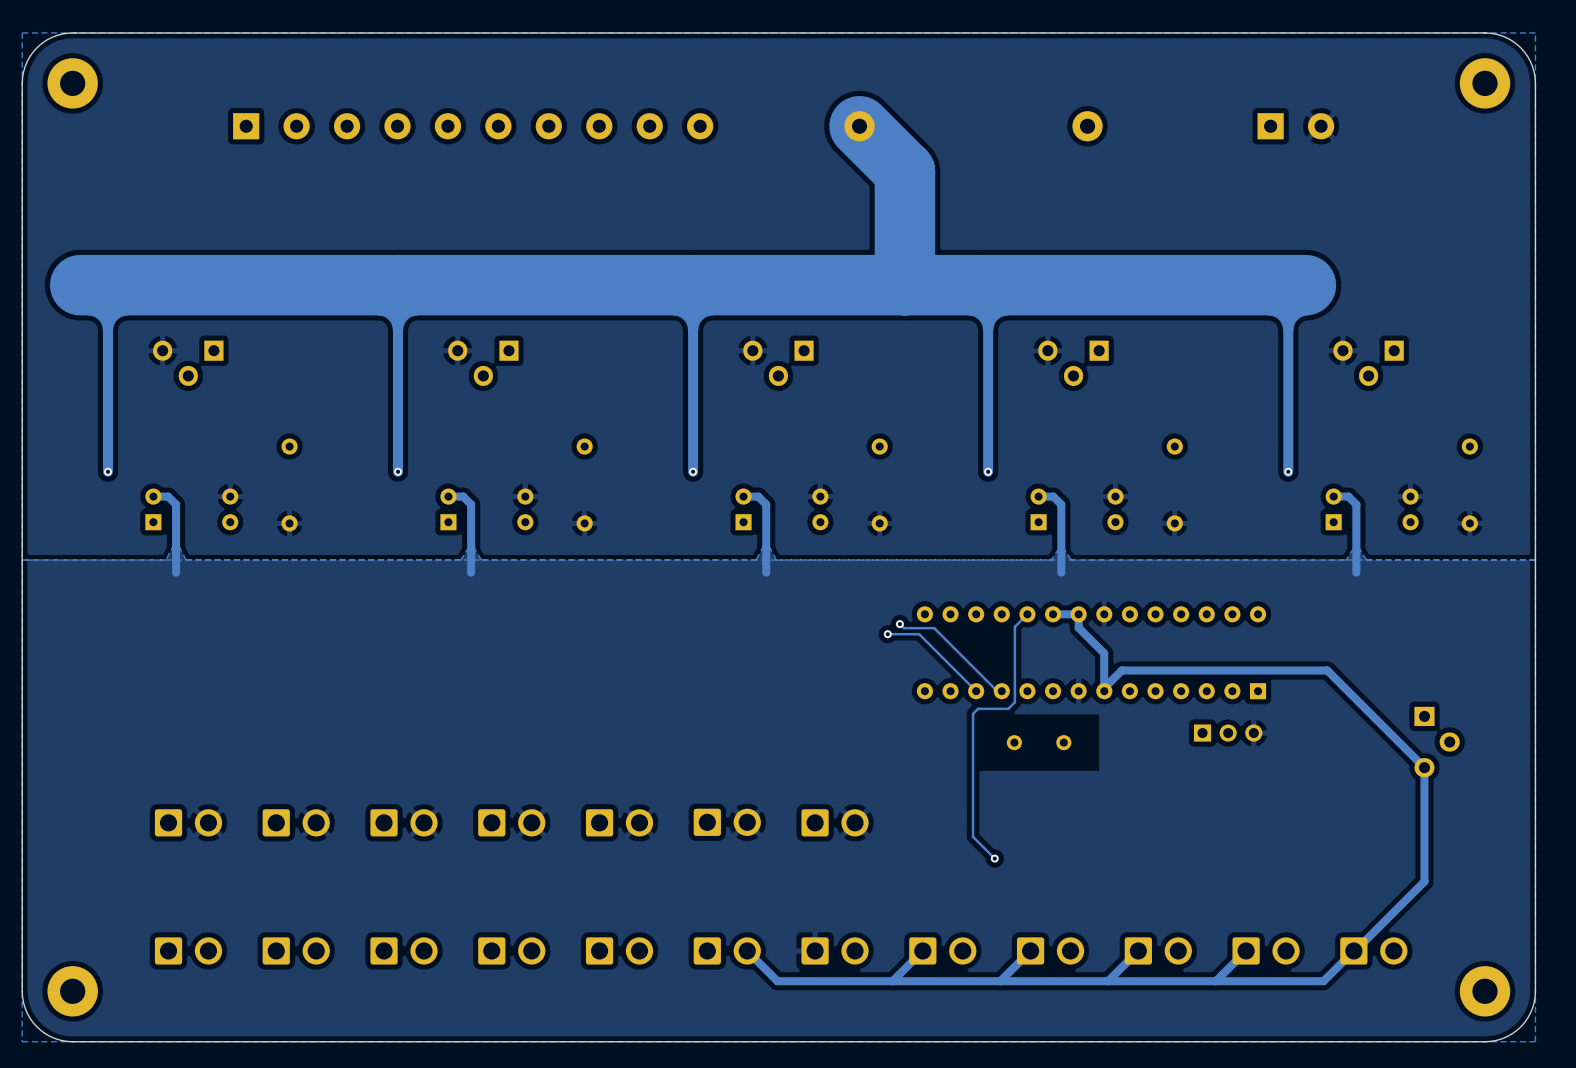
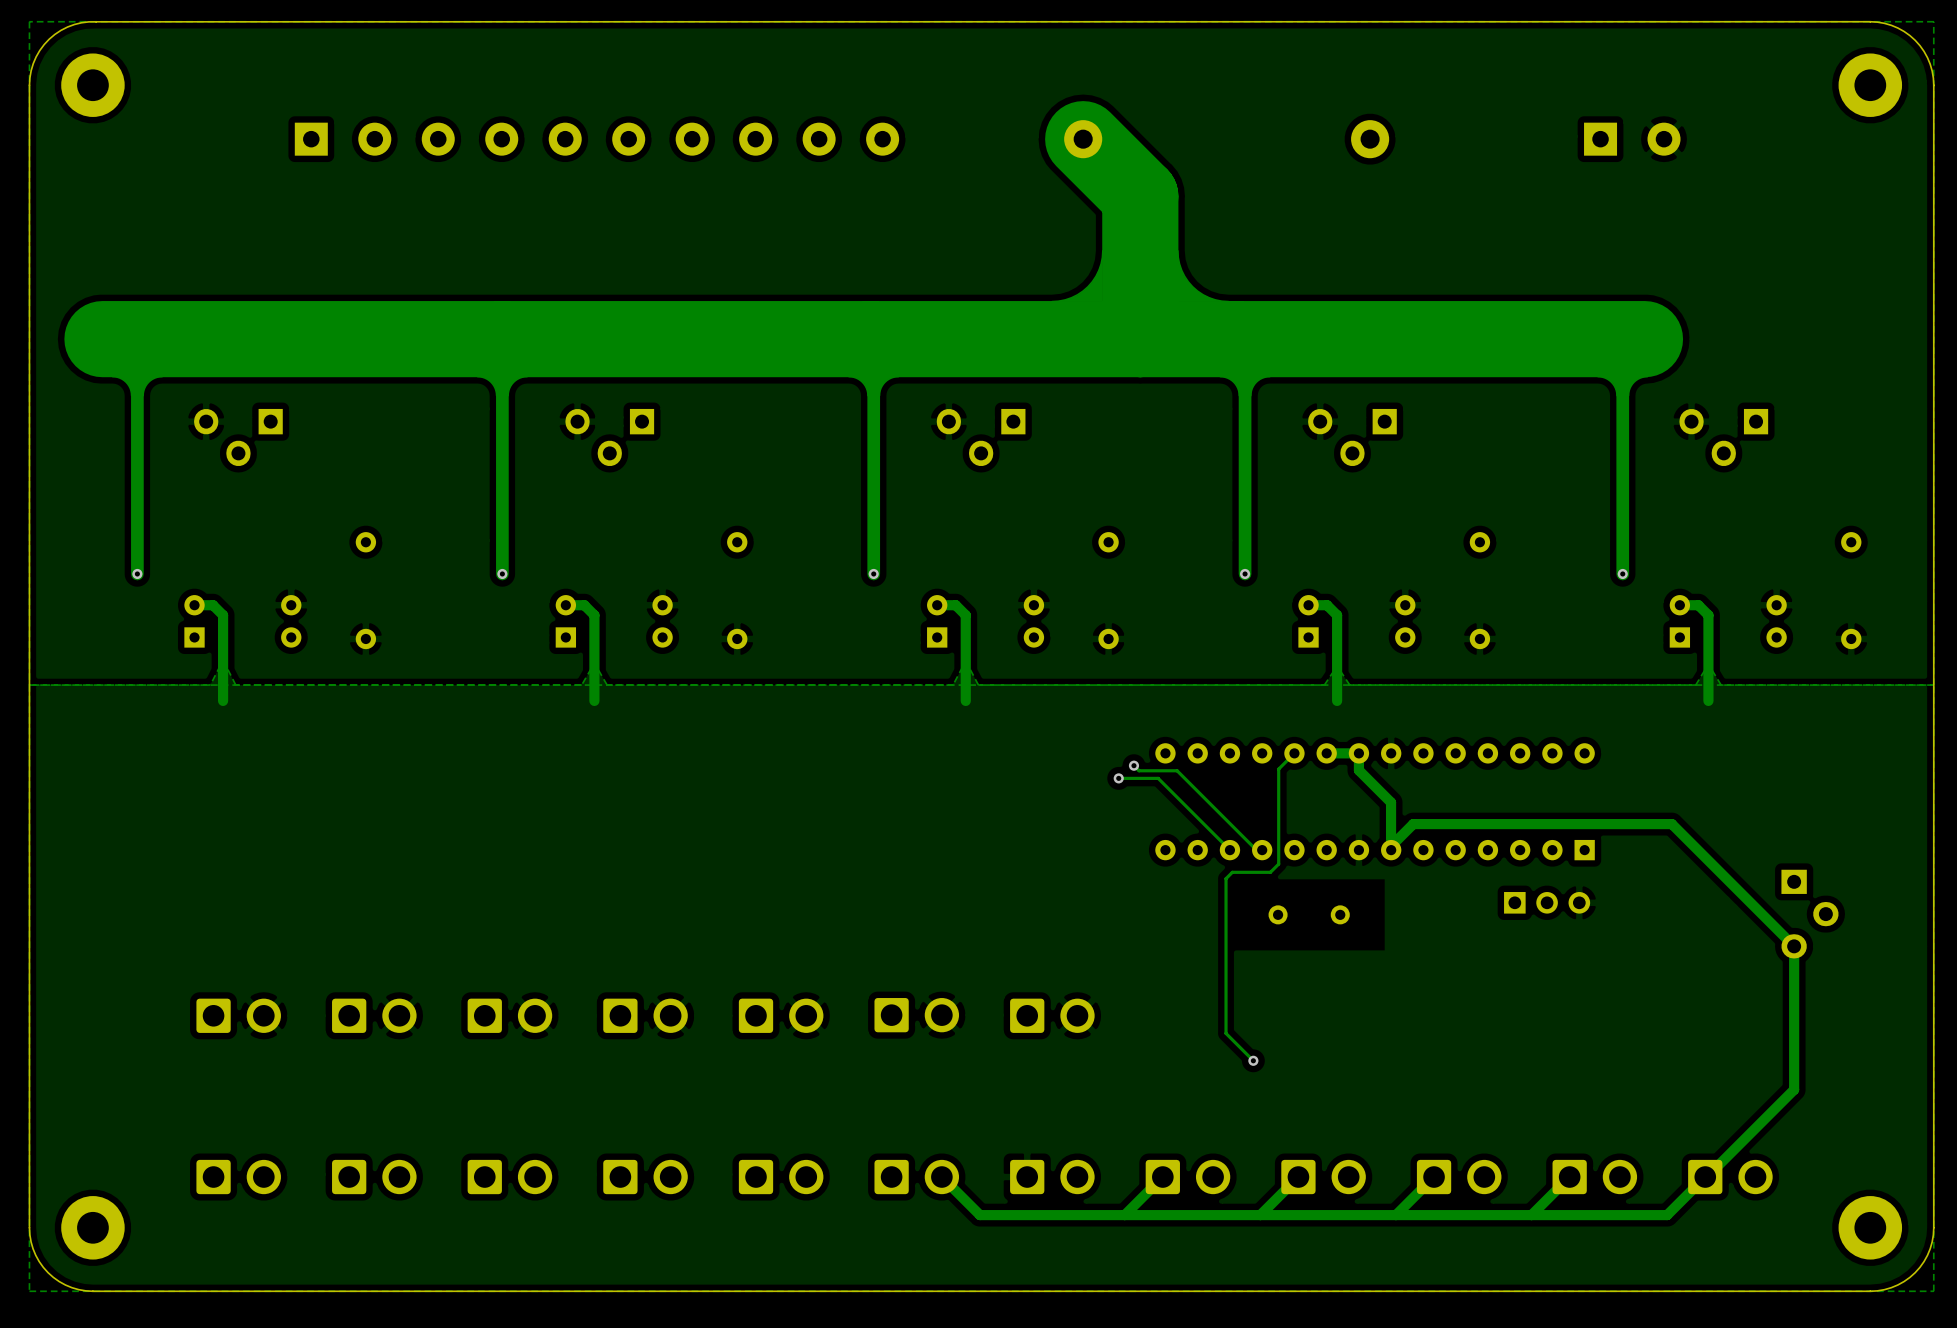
drawing: none -> [1052, 250, 1103, 302]
track: none -> (1102, 250) (1099, 270) (1088, 286) (1071, 297) (1052, 301)
track: none -> (1177, 250) (1181, 270) (1192, 286) (1209, 297) (1228, 301)
drawing: none -> [1177, 250, 1229, 302]

